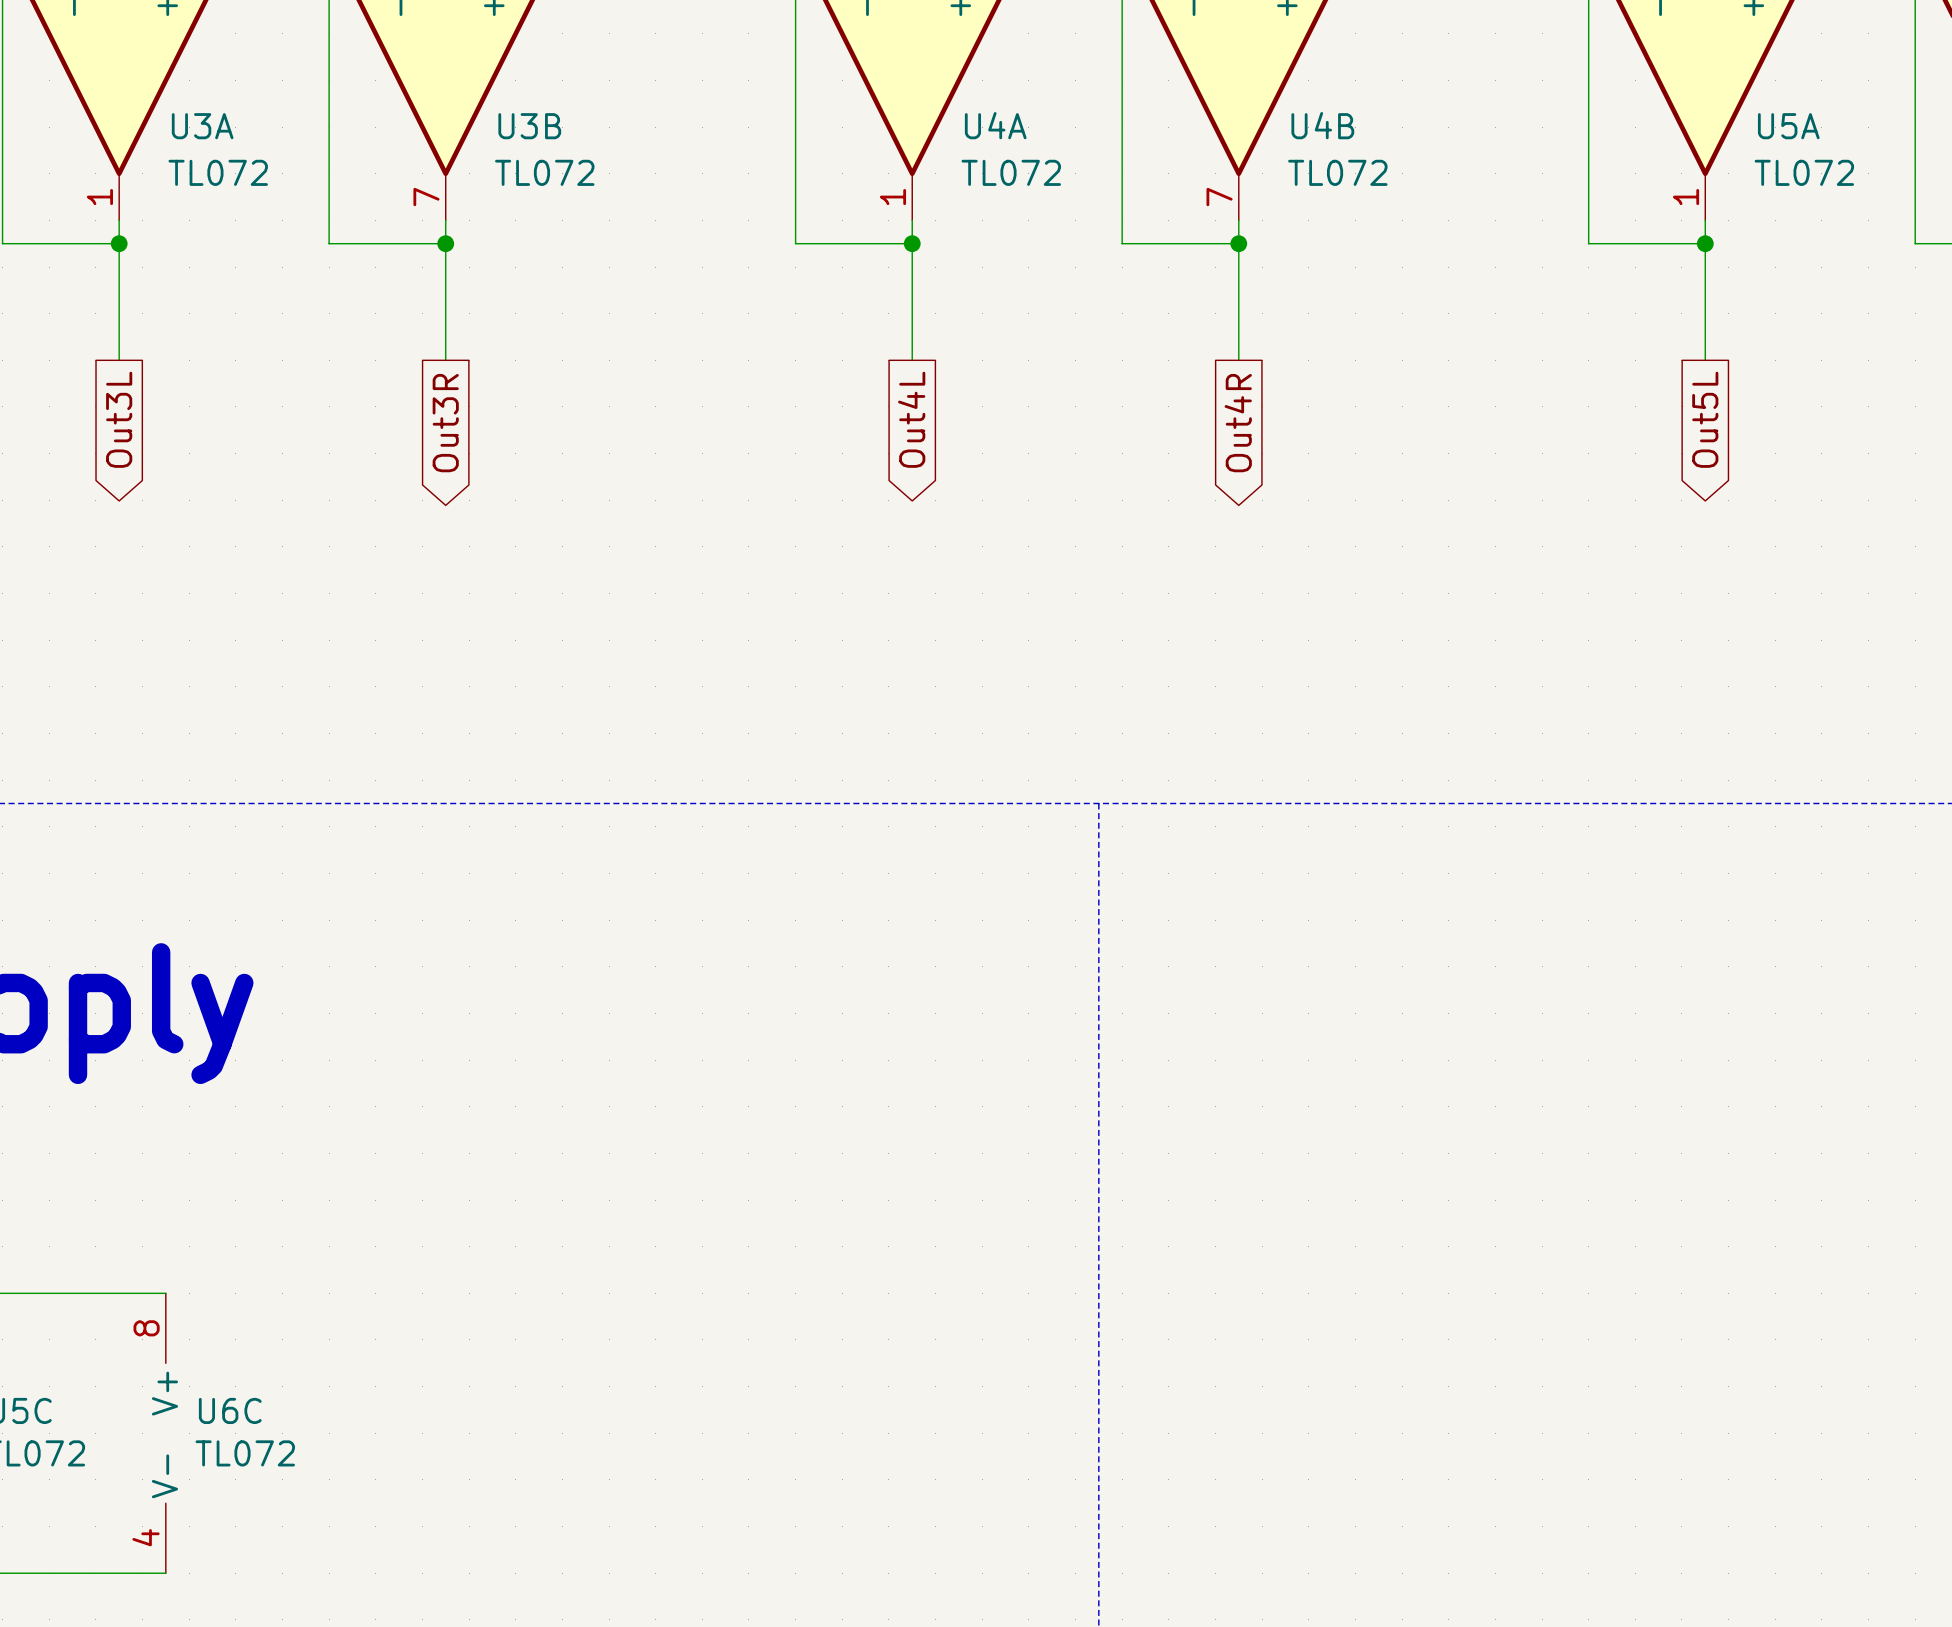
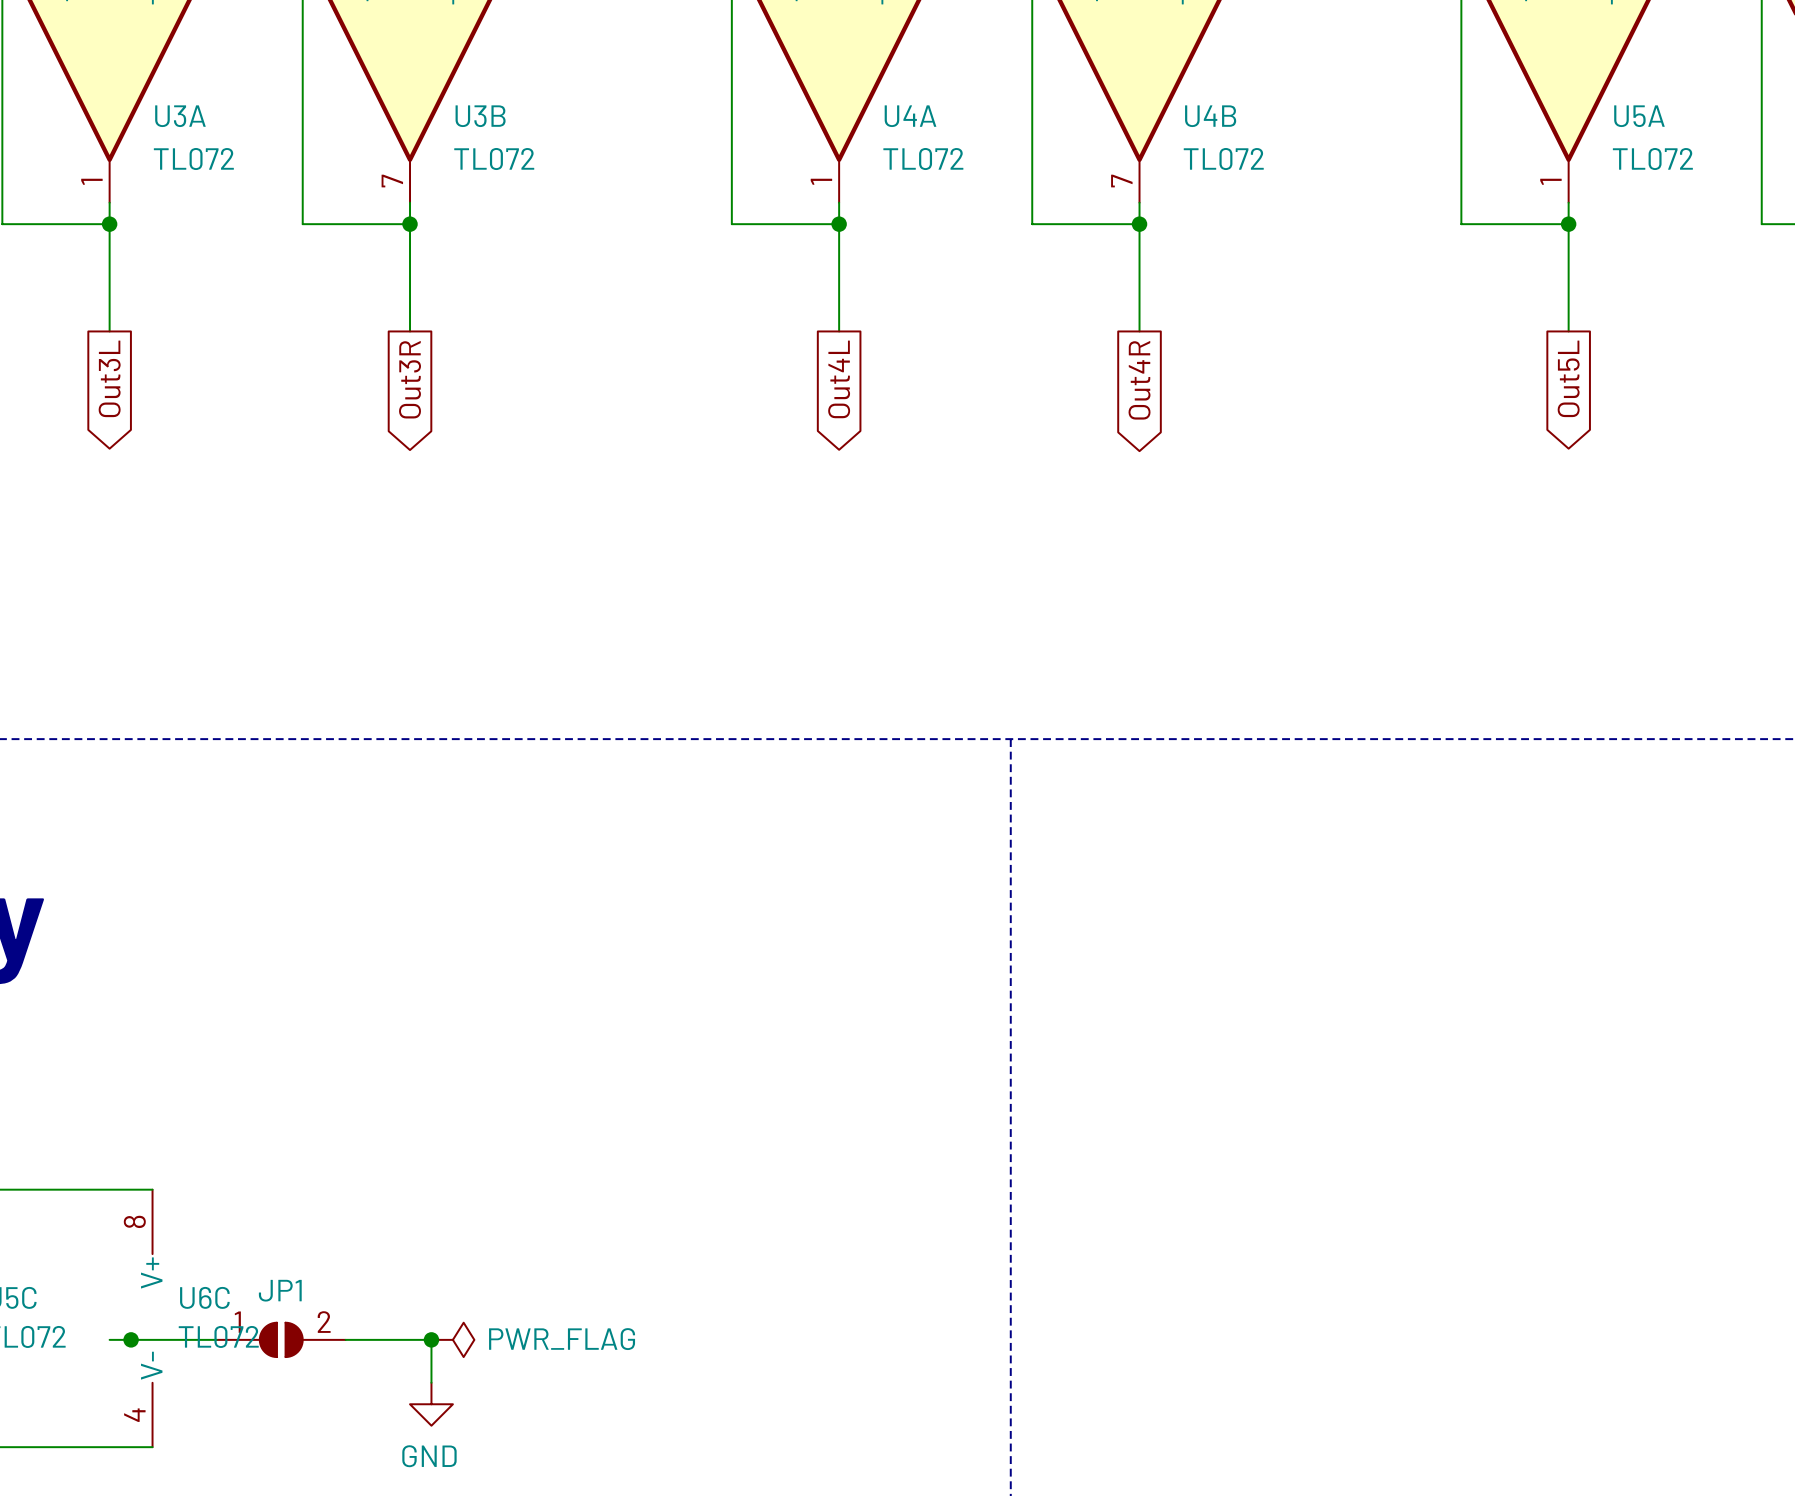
wire: none -> (109, 1339) (216, 1339)
junction: none -> (131, 1339)
JP1: none -> (281, 1339)
wire: none -> (345, 1339) (431, 1339) (431, 1382)
junction: none -> (431, 1339)
power symbol: none -> PWR_FLAG (452, 1339)
power symbol: none -> GND (431, 1404)

